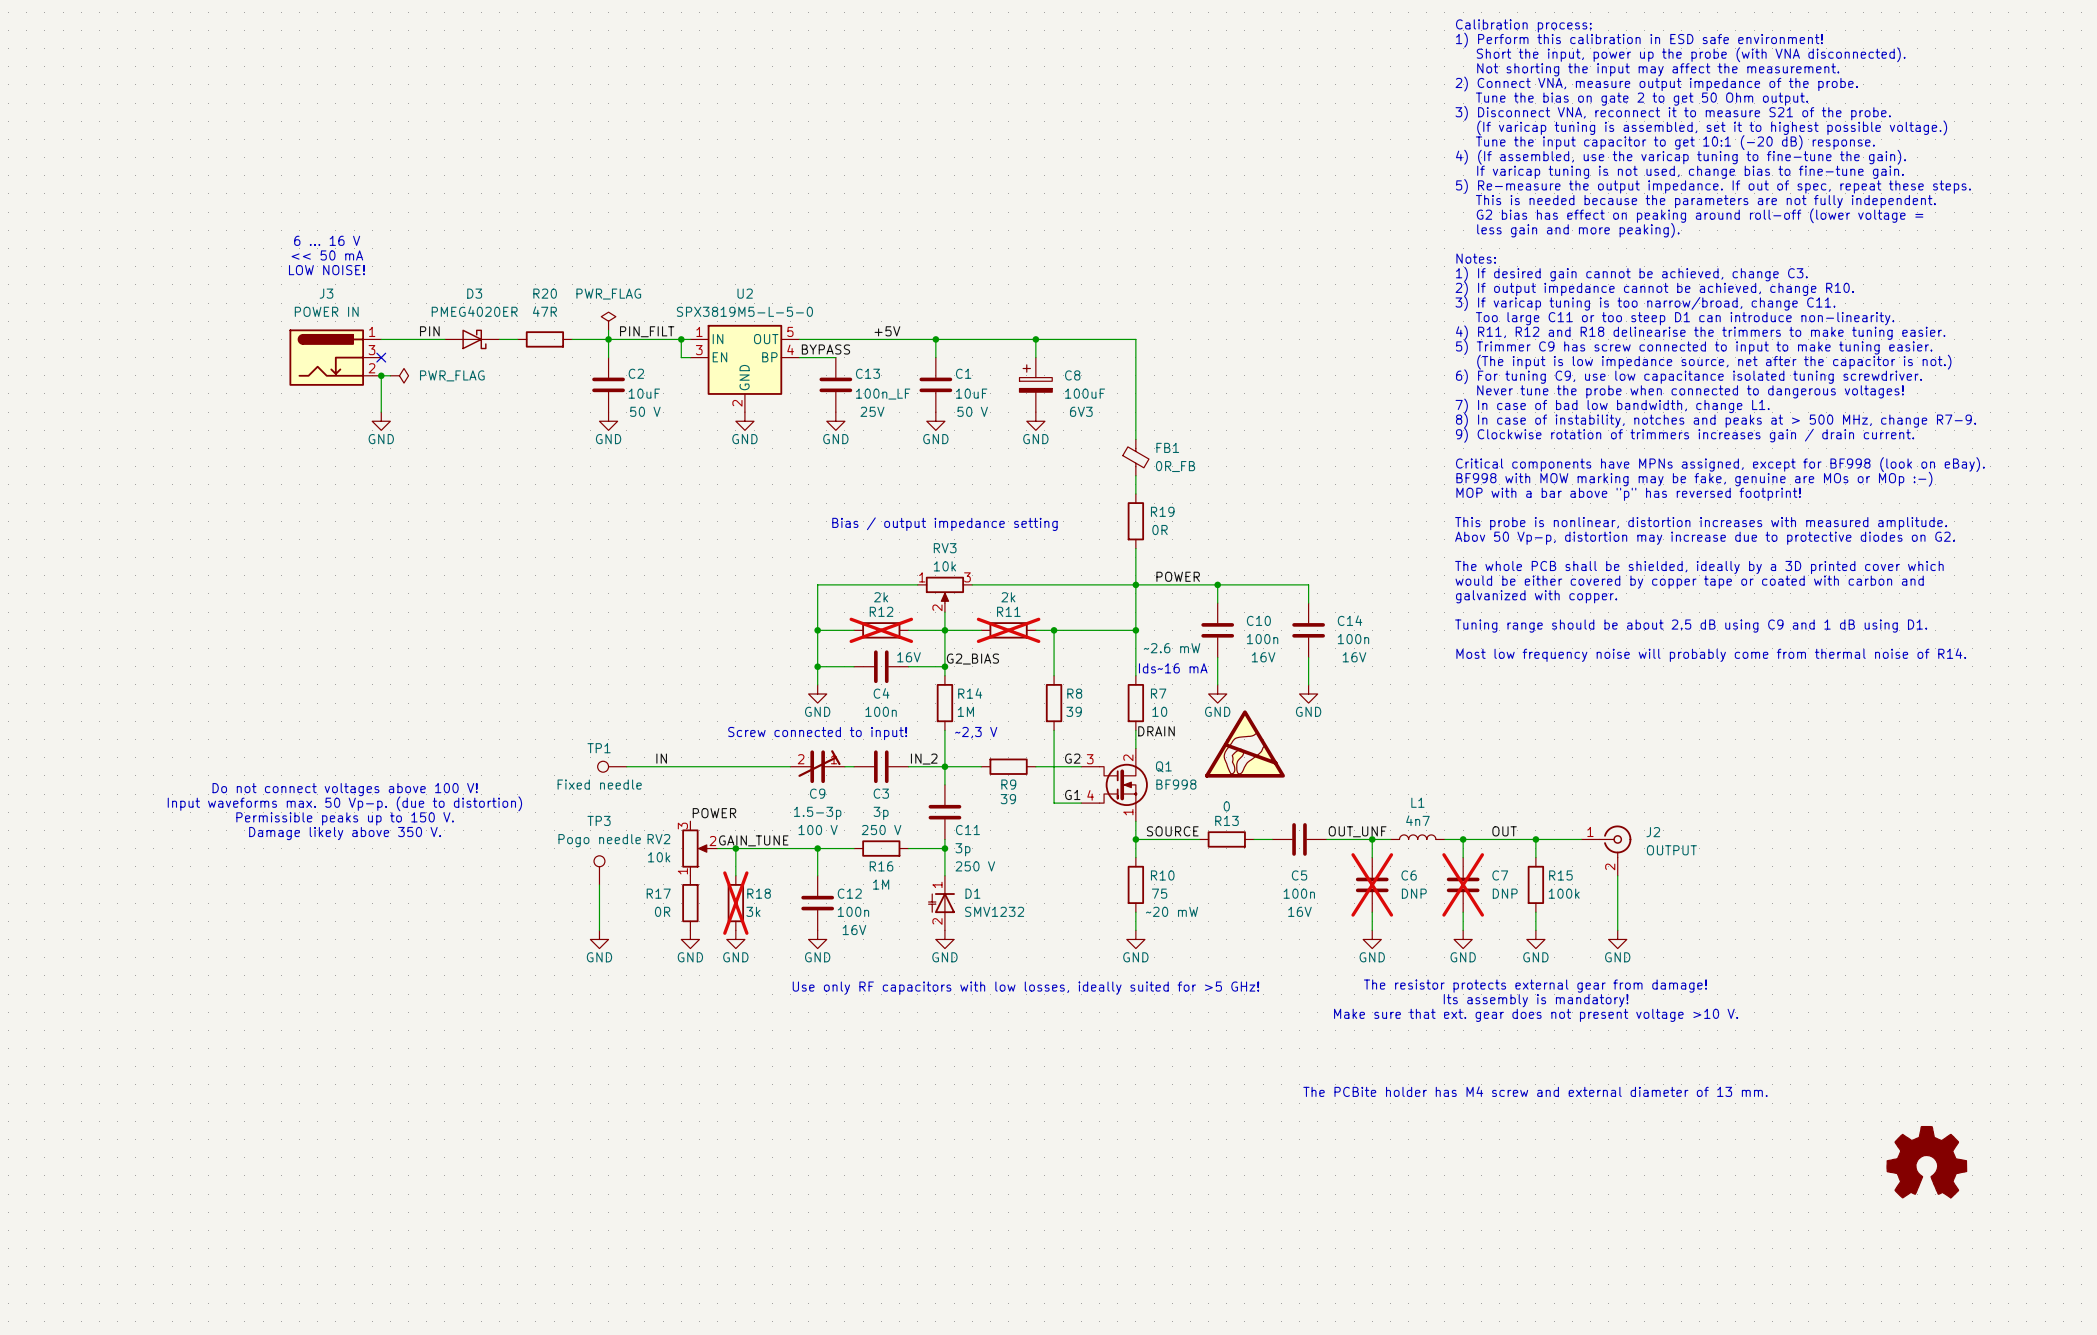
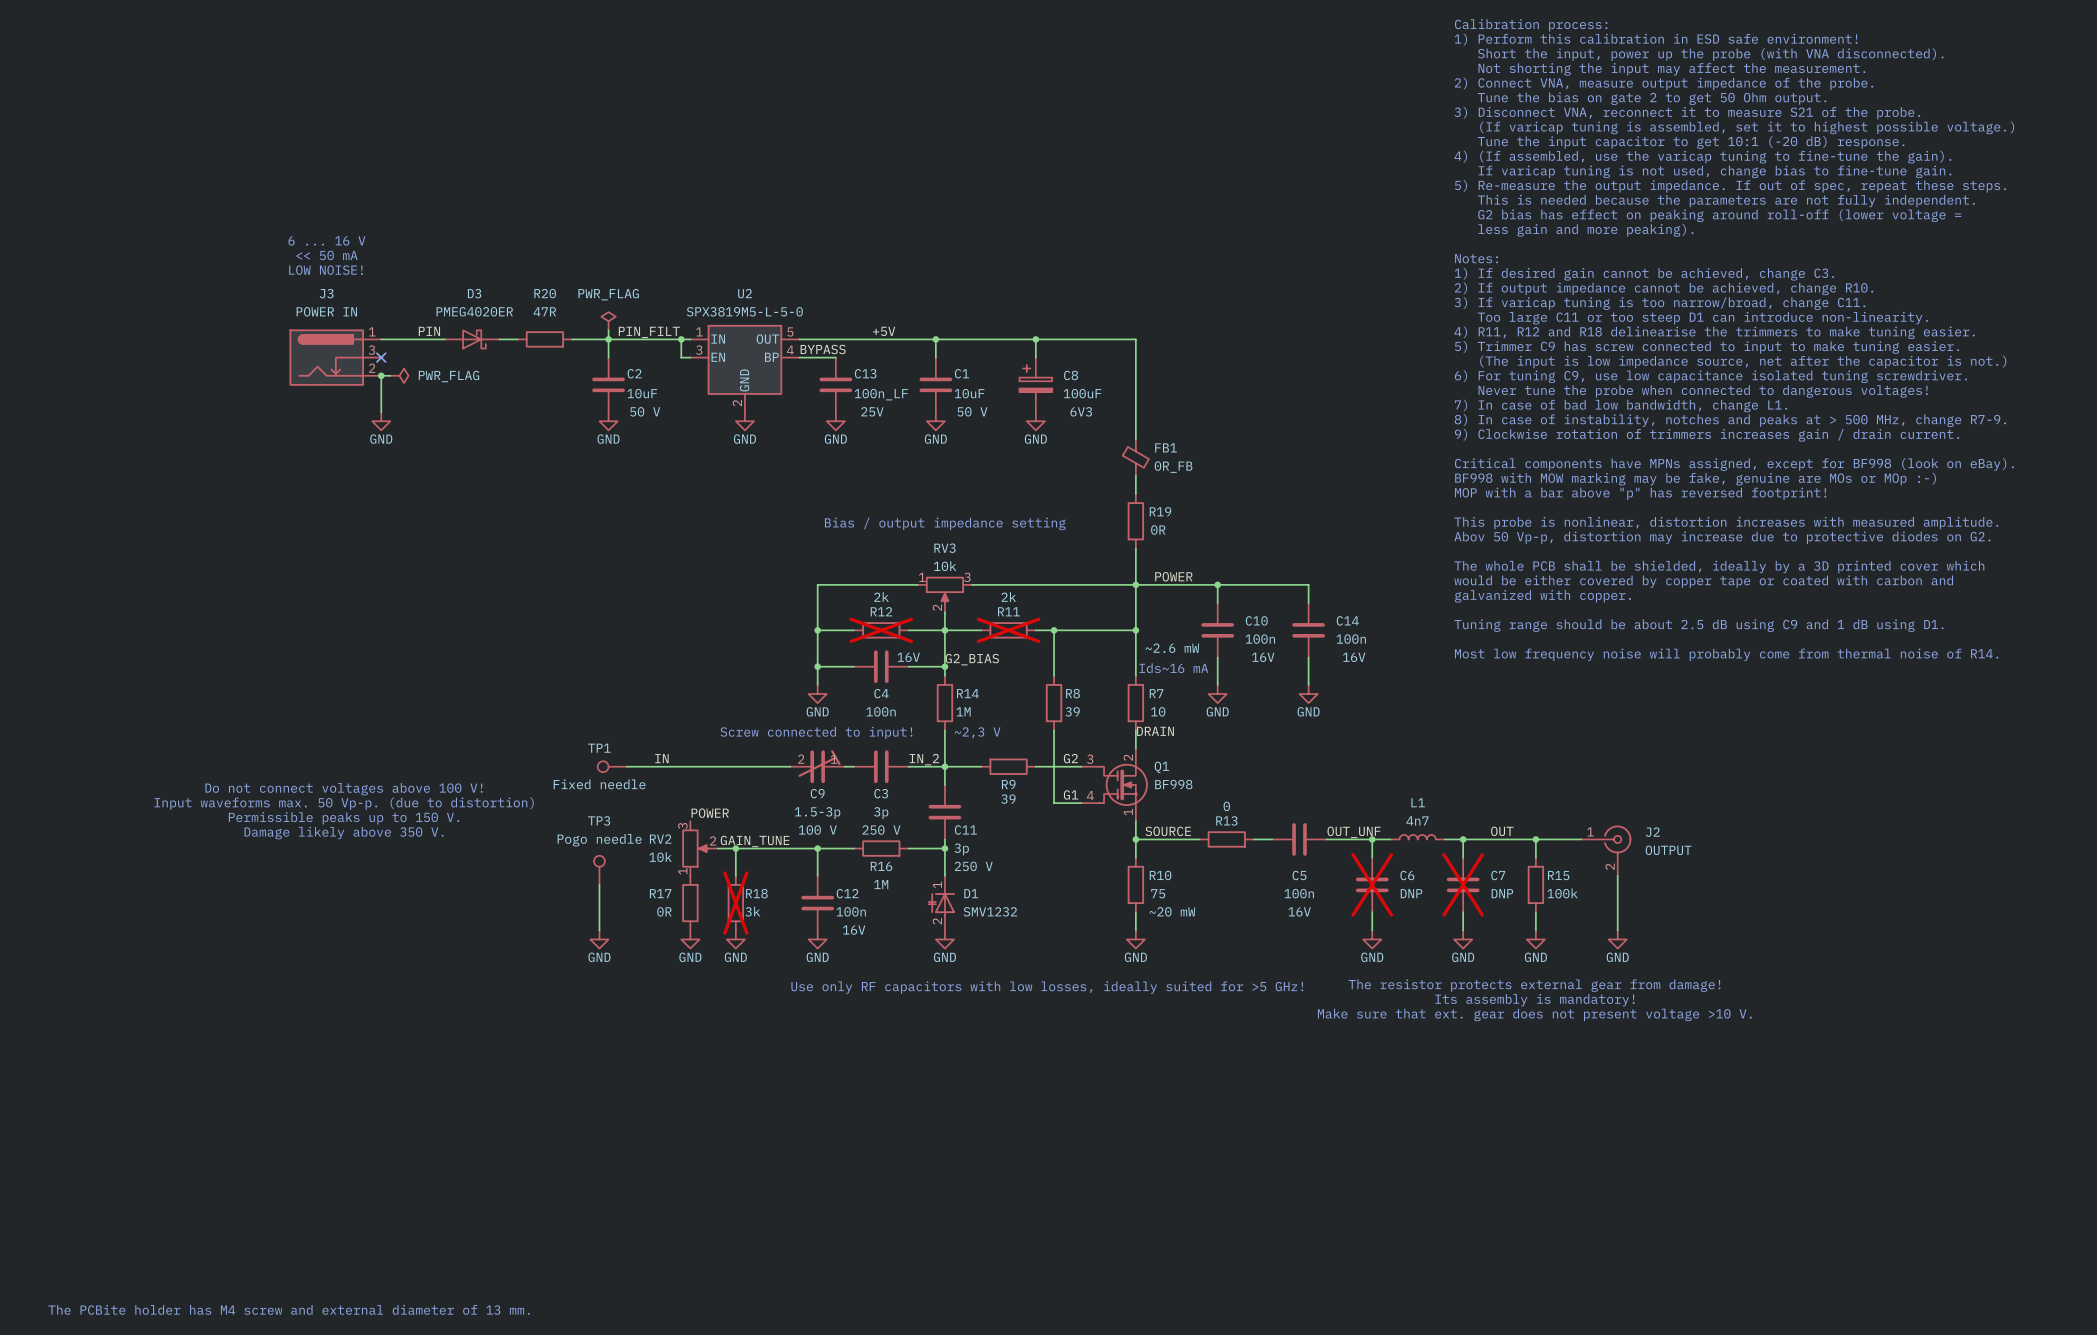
part: (1244, 743) -> none
text: The PCBite holder has M4 screw and external diameter of 13 mm. (1535, 1091) -> none
part: (1926, 1162) -> none
text: none -> The PCBite holder has M4 screw and external diameter of 13 mm. (289, 1309)

